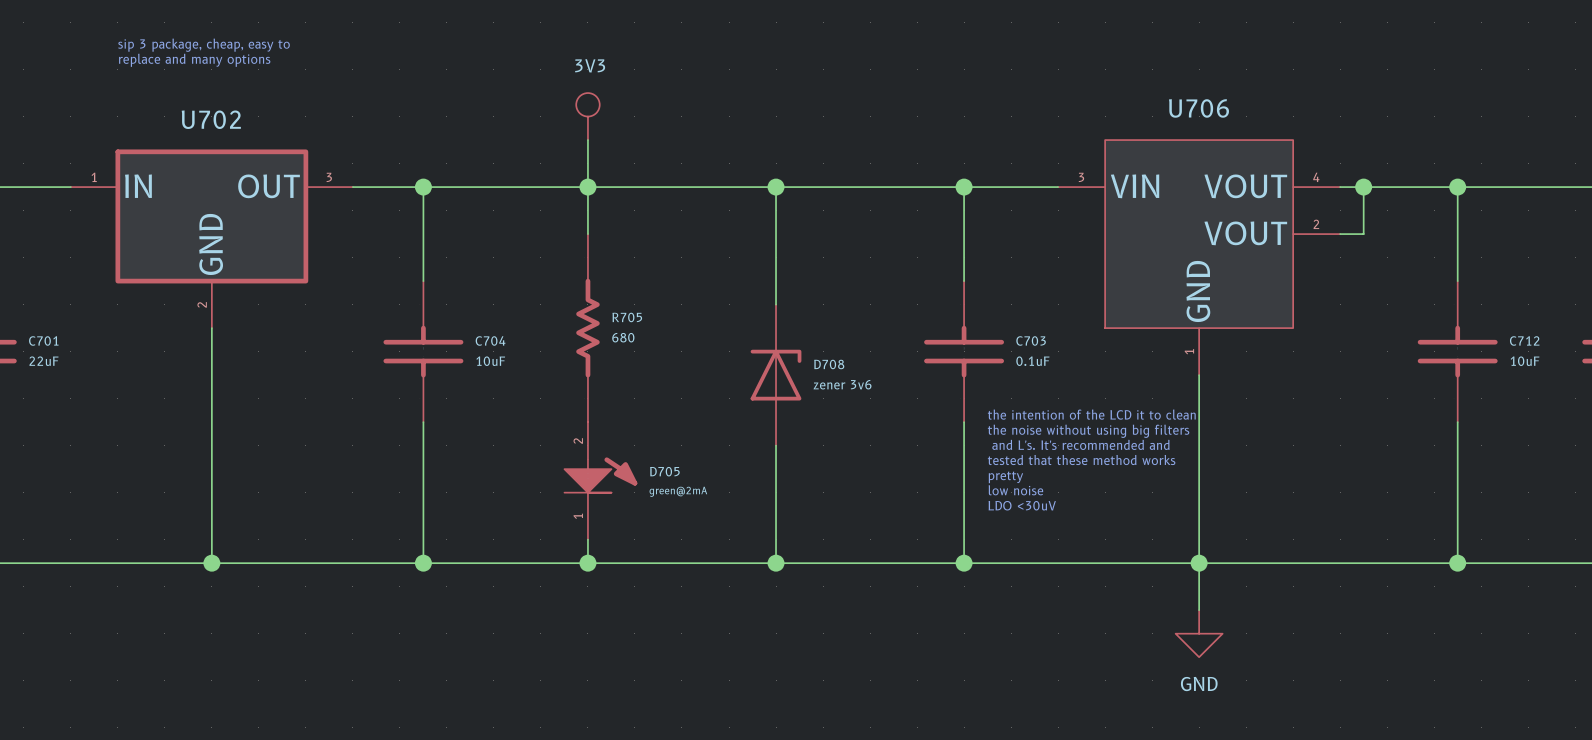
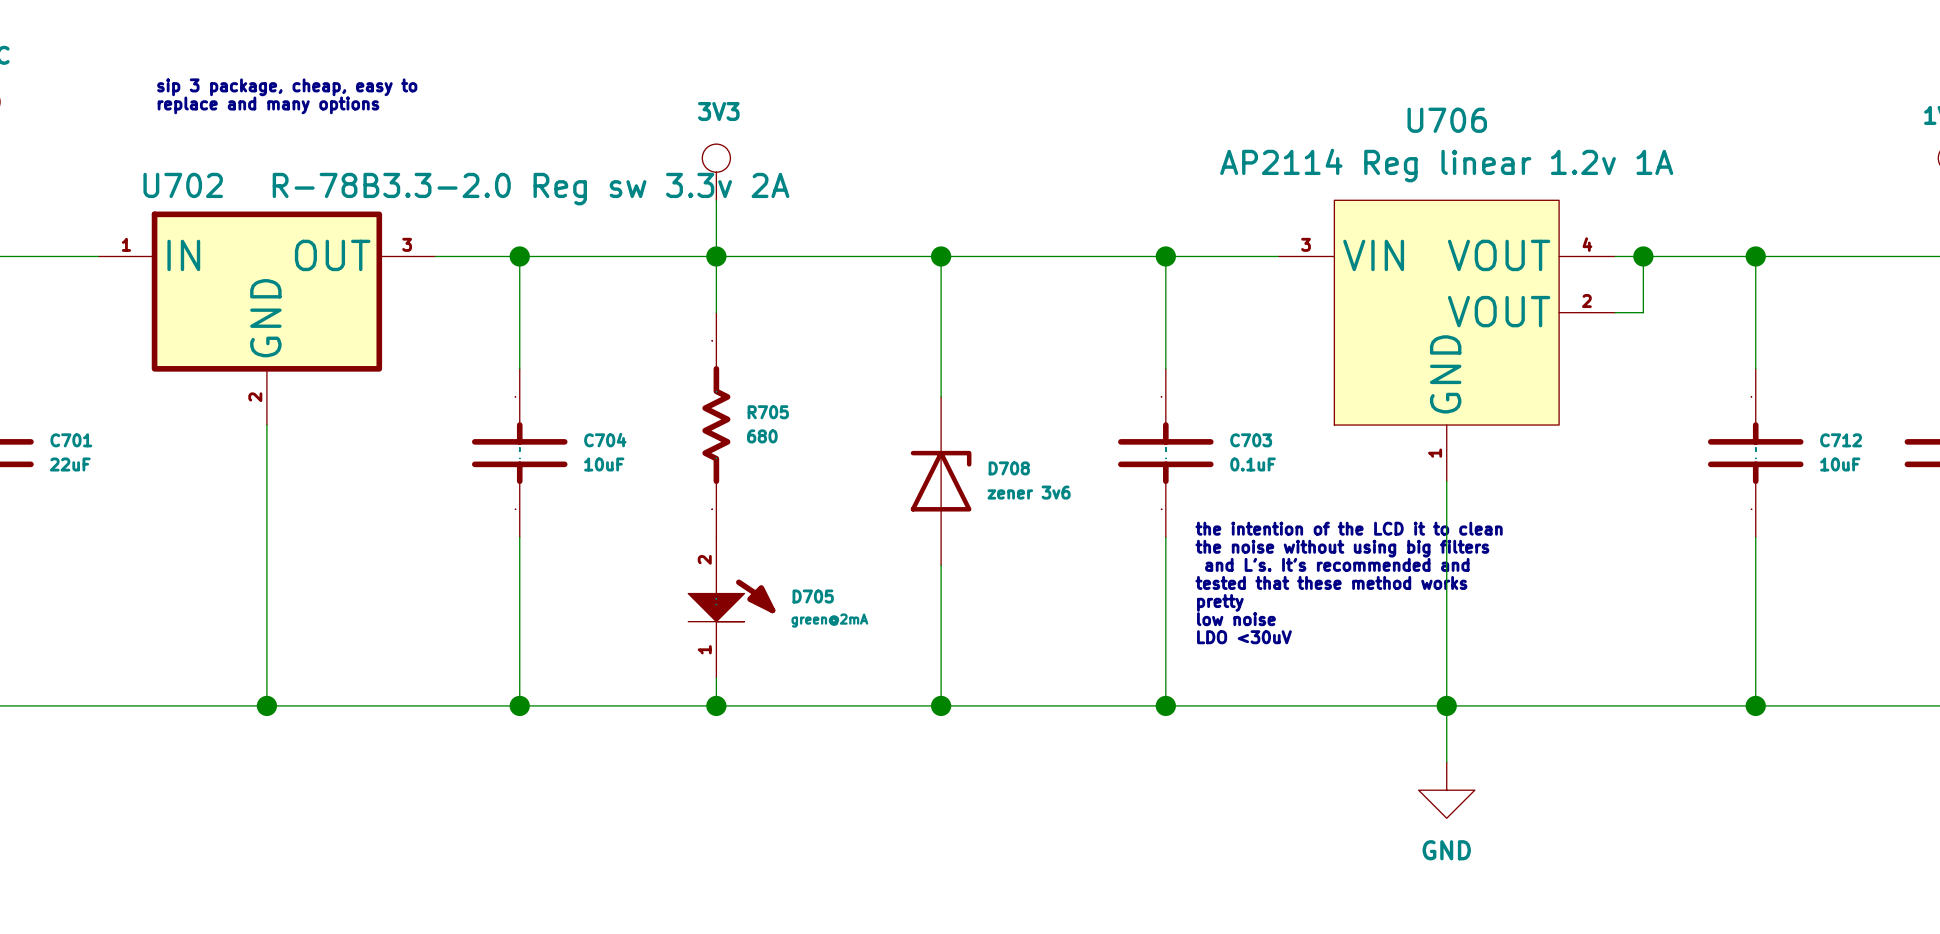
U706 name position: U706 (1198, 108) -> U706 (1447, 120)
U706 value: none -> AP2114 Reg linear 1.2v 1A (1446, 165)
U702 name position: U702 (211, 119) -> U702 (183, 185)
U702 value: none -> R-78B3.3-2.0 Reg sw 3.3v 2A (531, 189)

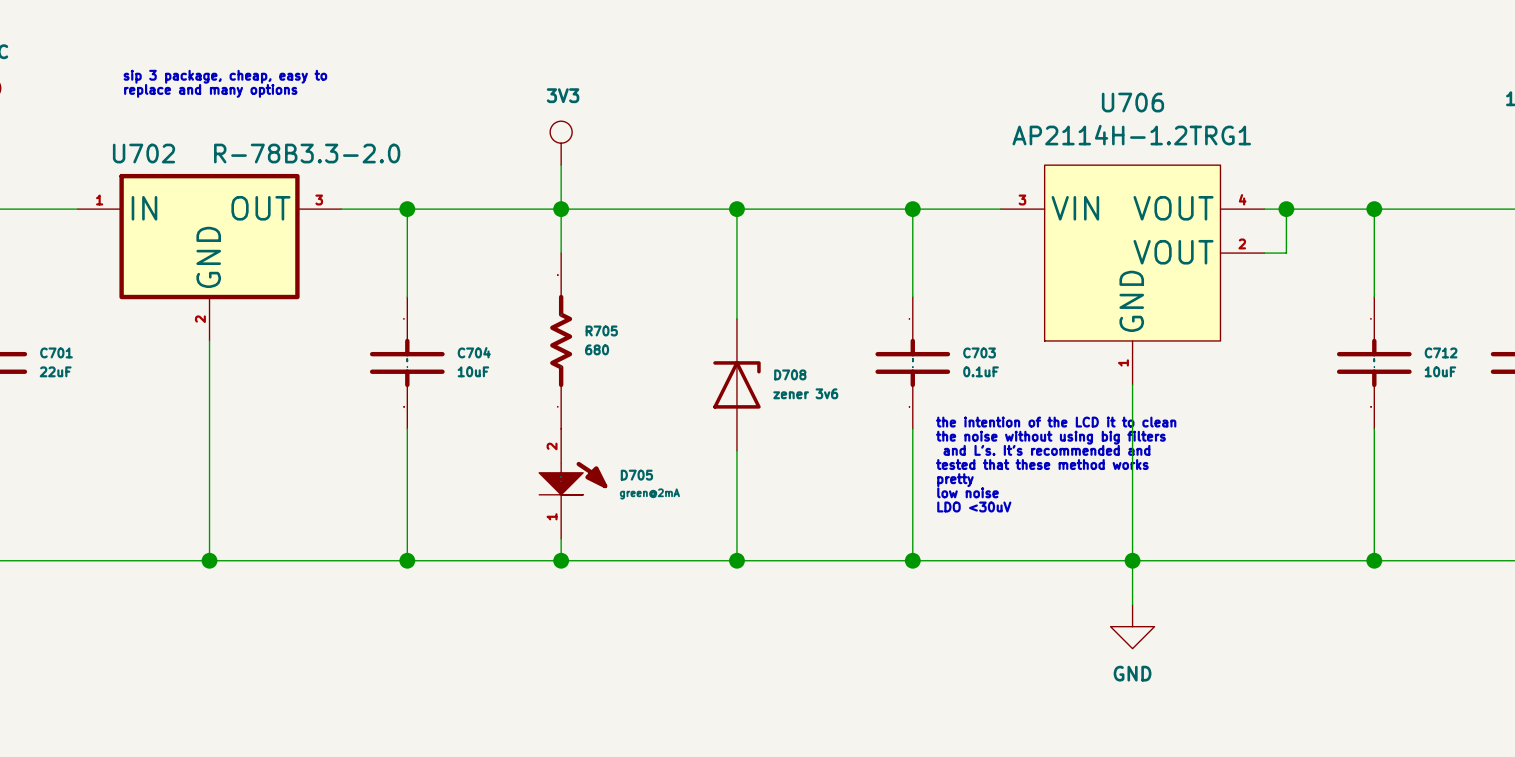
U706 value: AP2114 Reg linear 1.2v 1A (1446, 165) -> AP2114H-1.2TRG1 (1131, 135)
U702 value: R-78B3.3-2.0 Reg sw 3.3v 2A (531, 189) -> R-78B3.3-2.0 (307, 153)

